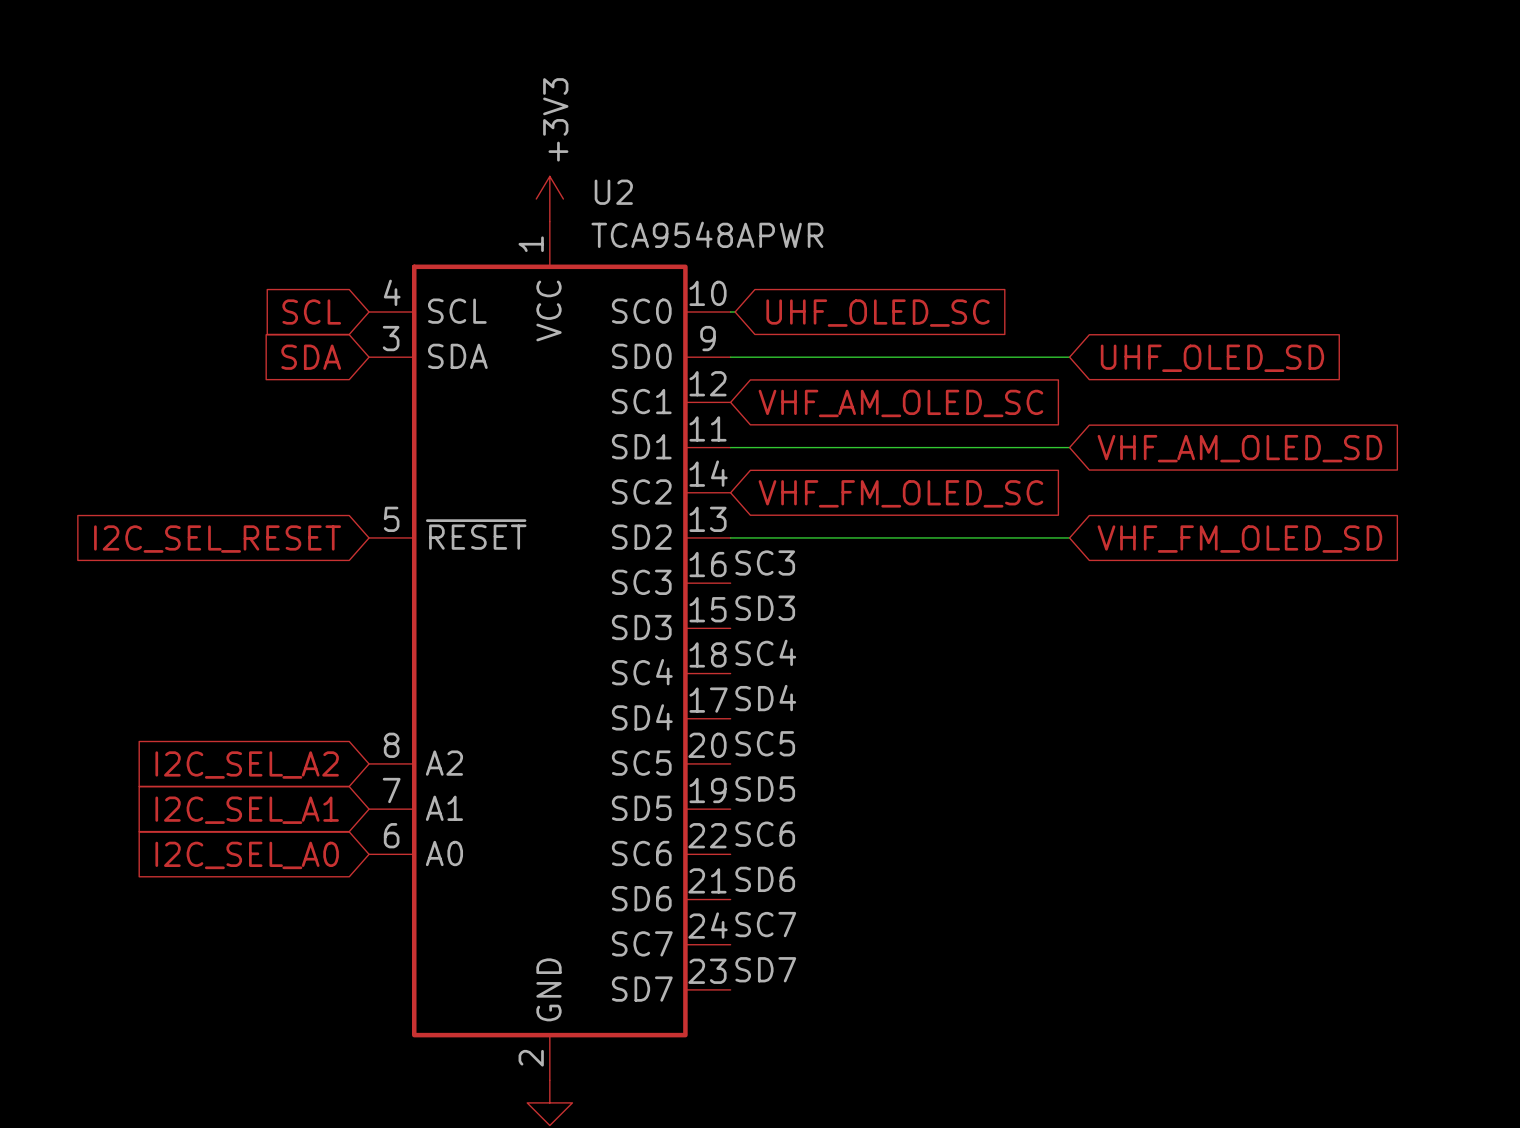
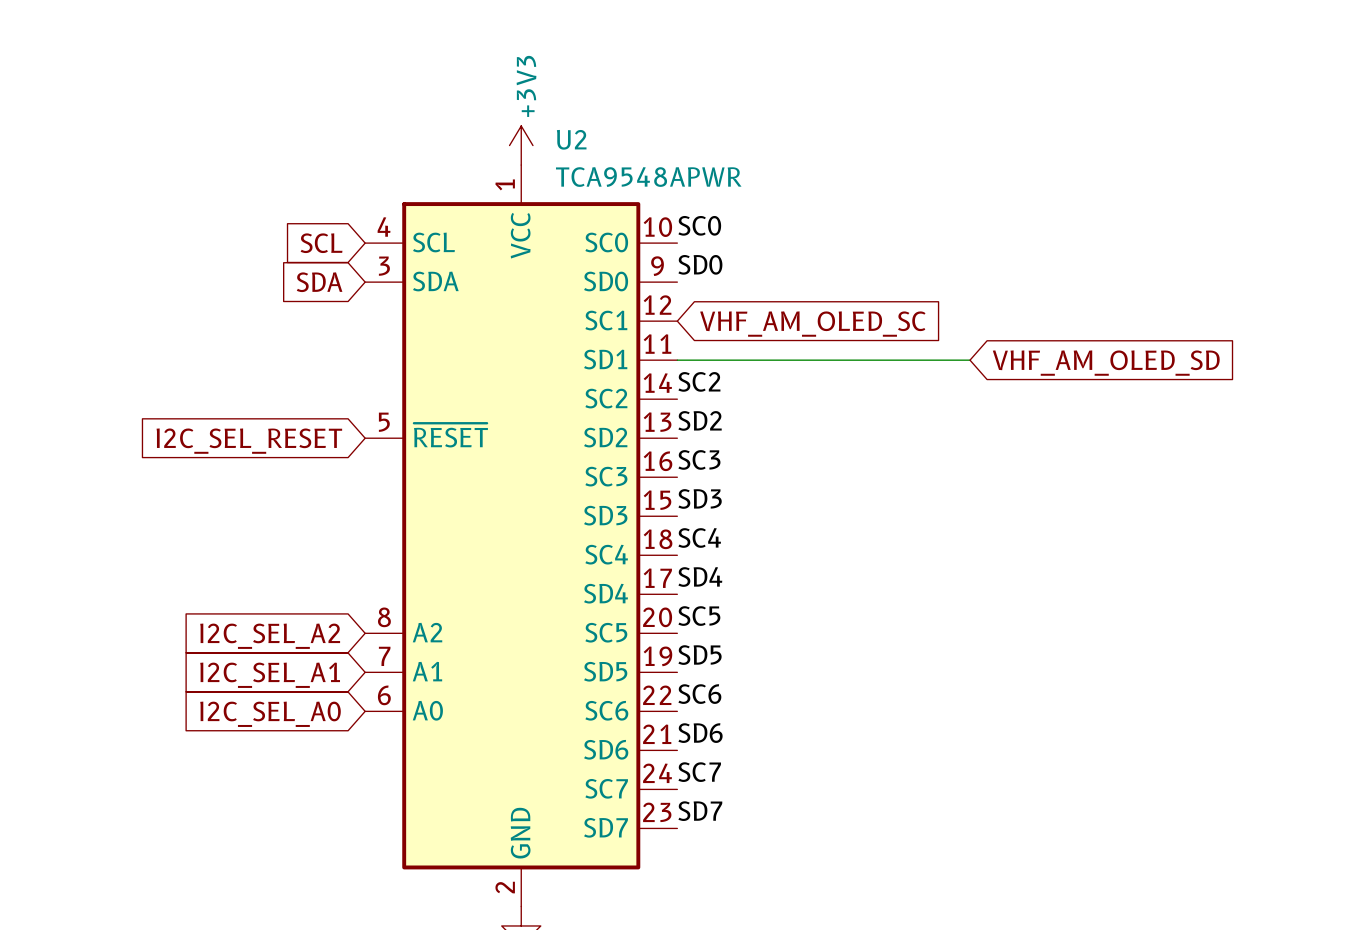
label: none -> SC0 (699, 225)
wire: (730, 312) (735, 312) -> none
global label: UHF_OLED_SC (878, 313) -> none
label: none -> SD0 (700, 264)
wire: (730, 357) (1069, 357) -> none
global label: UHF_OLED_SD (1212, 358) -> none
label: none -> SC2 (699, 381)
global label: VHF_FM_OLED_SC (900, 493) -> none
label: none -> SD2 (700, 420)
wire: (730, 537) (1069, 537) -> none
global label: VHF_FM_OLED_SD (1239, 539) -> none

